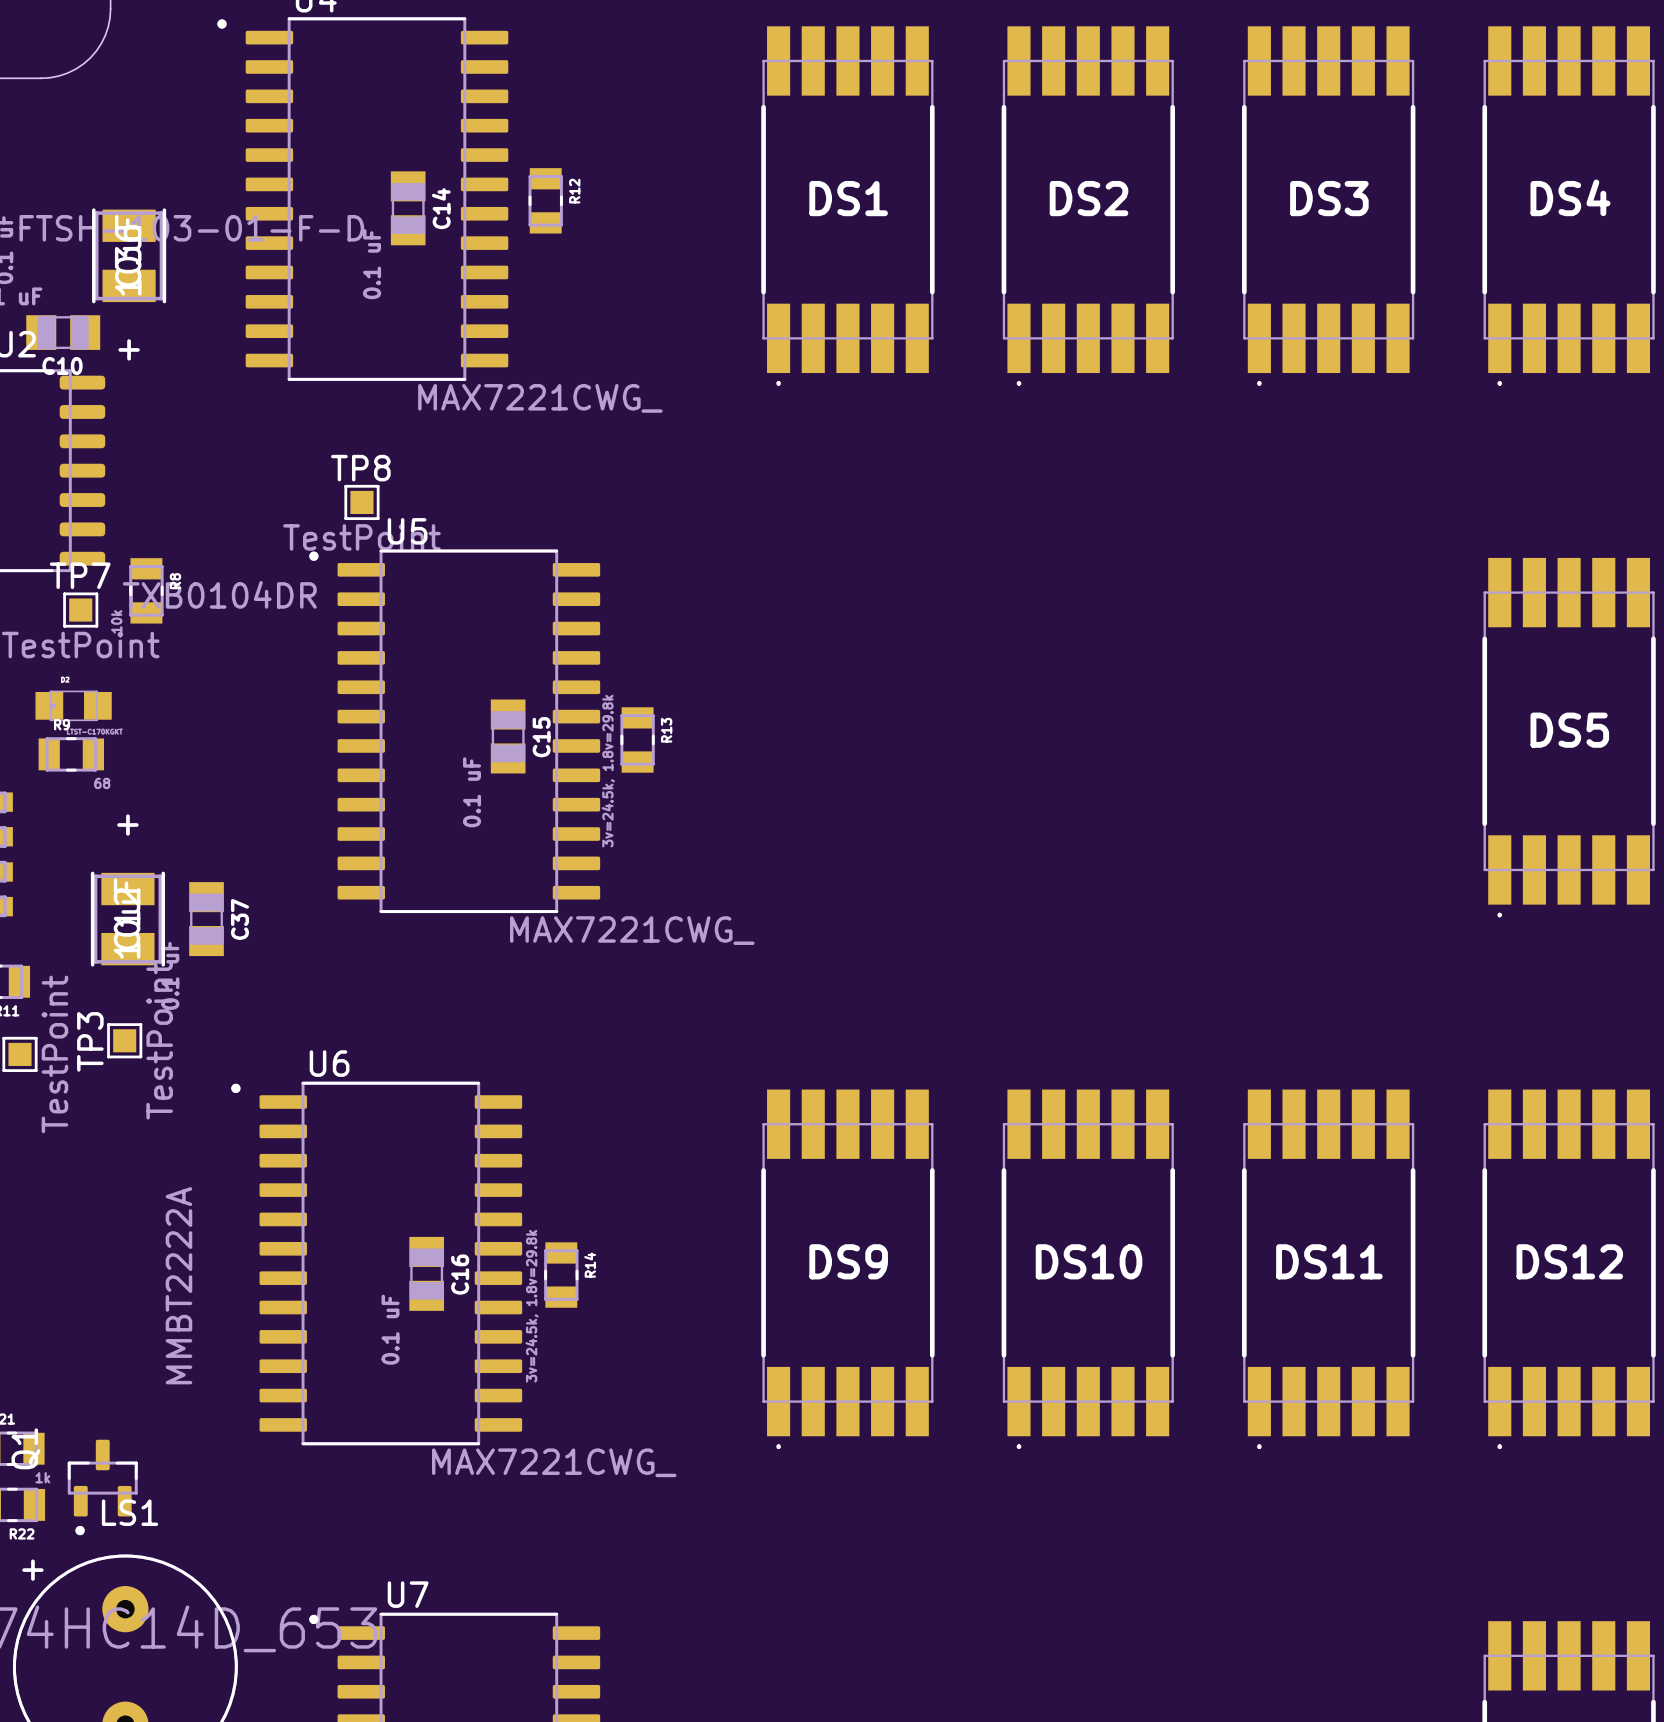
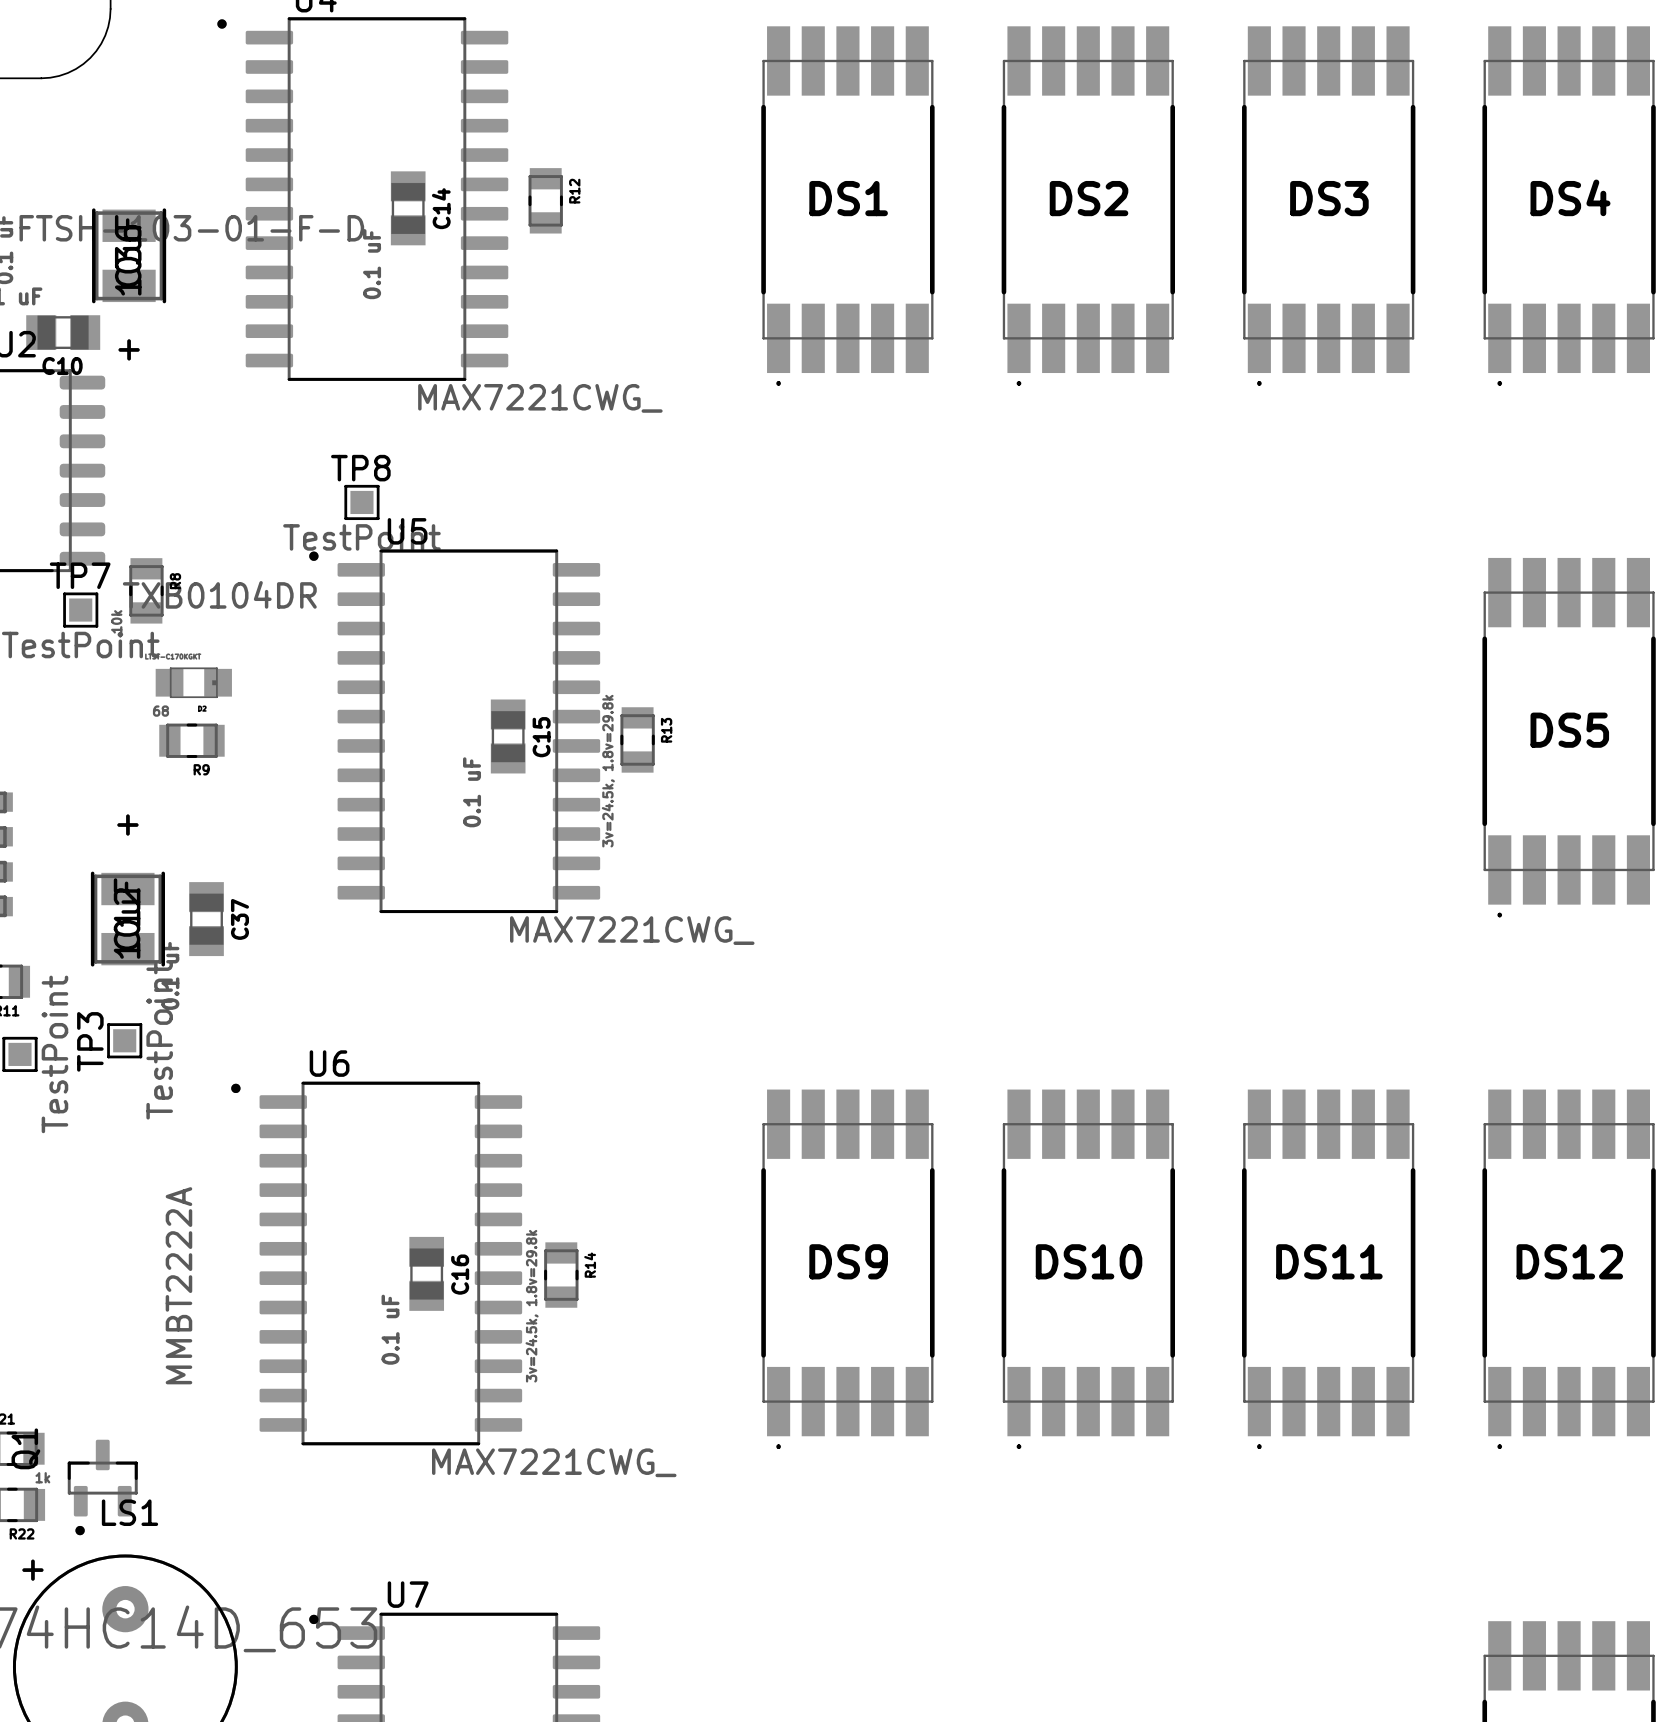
part rotation: 0° (73, 705) -> 180° (193, 682)
part position: (73, 705) -> (193, 682)
R9 name position: R9 (62, 724) -> R9 (201, 769)
R9 position: (71, 754) -> (191, 740)
R9 value position: 68 (102, 783) -> 68 (160, 711)

